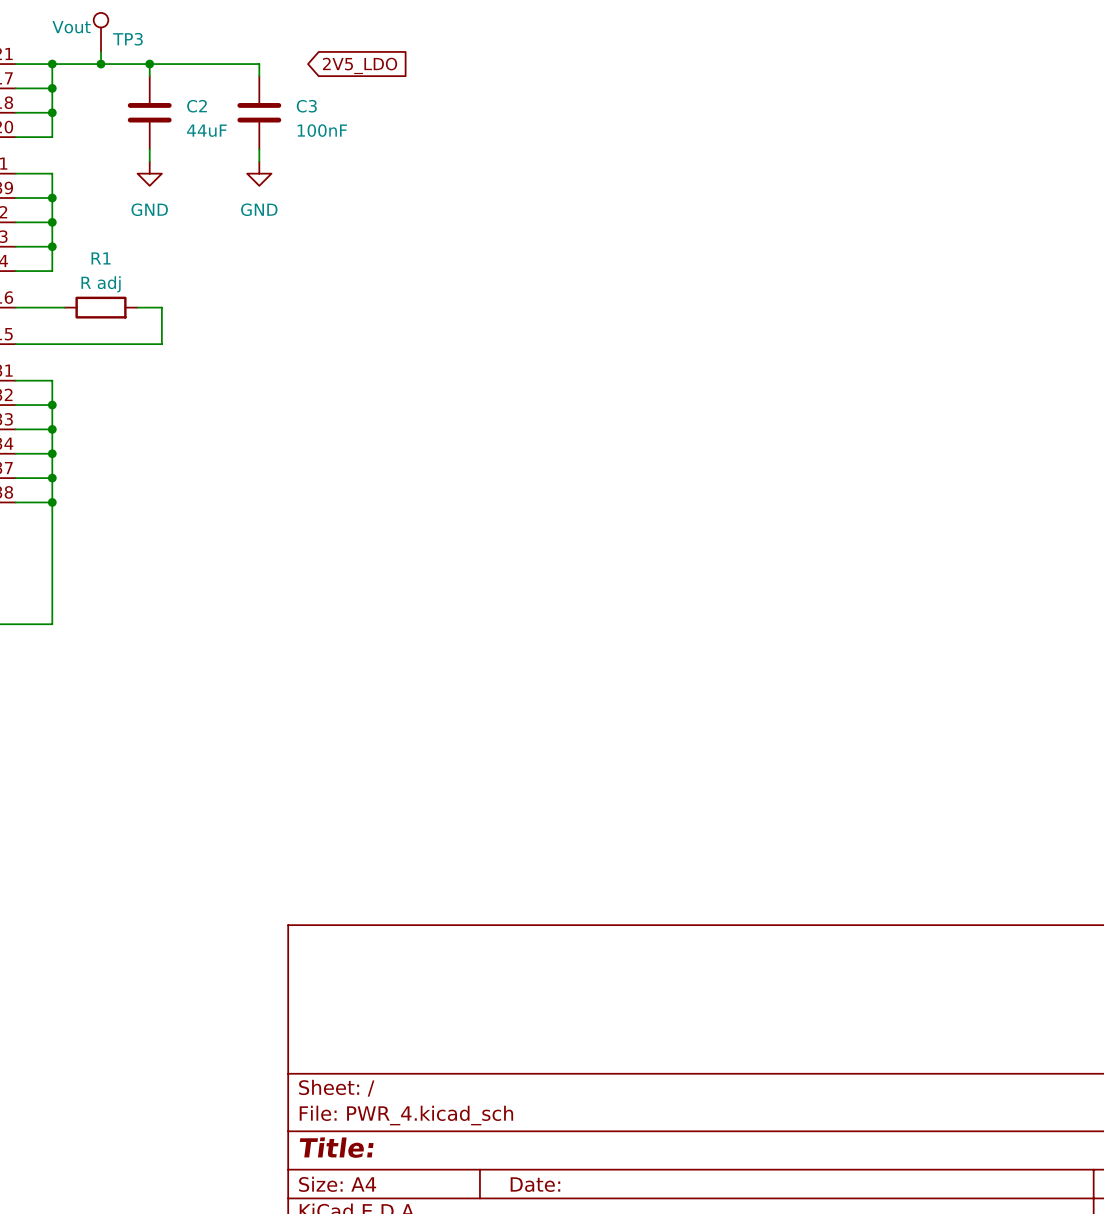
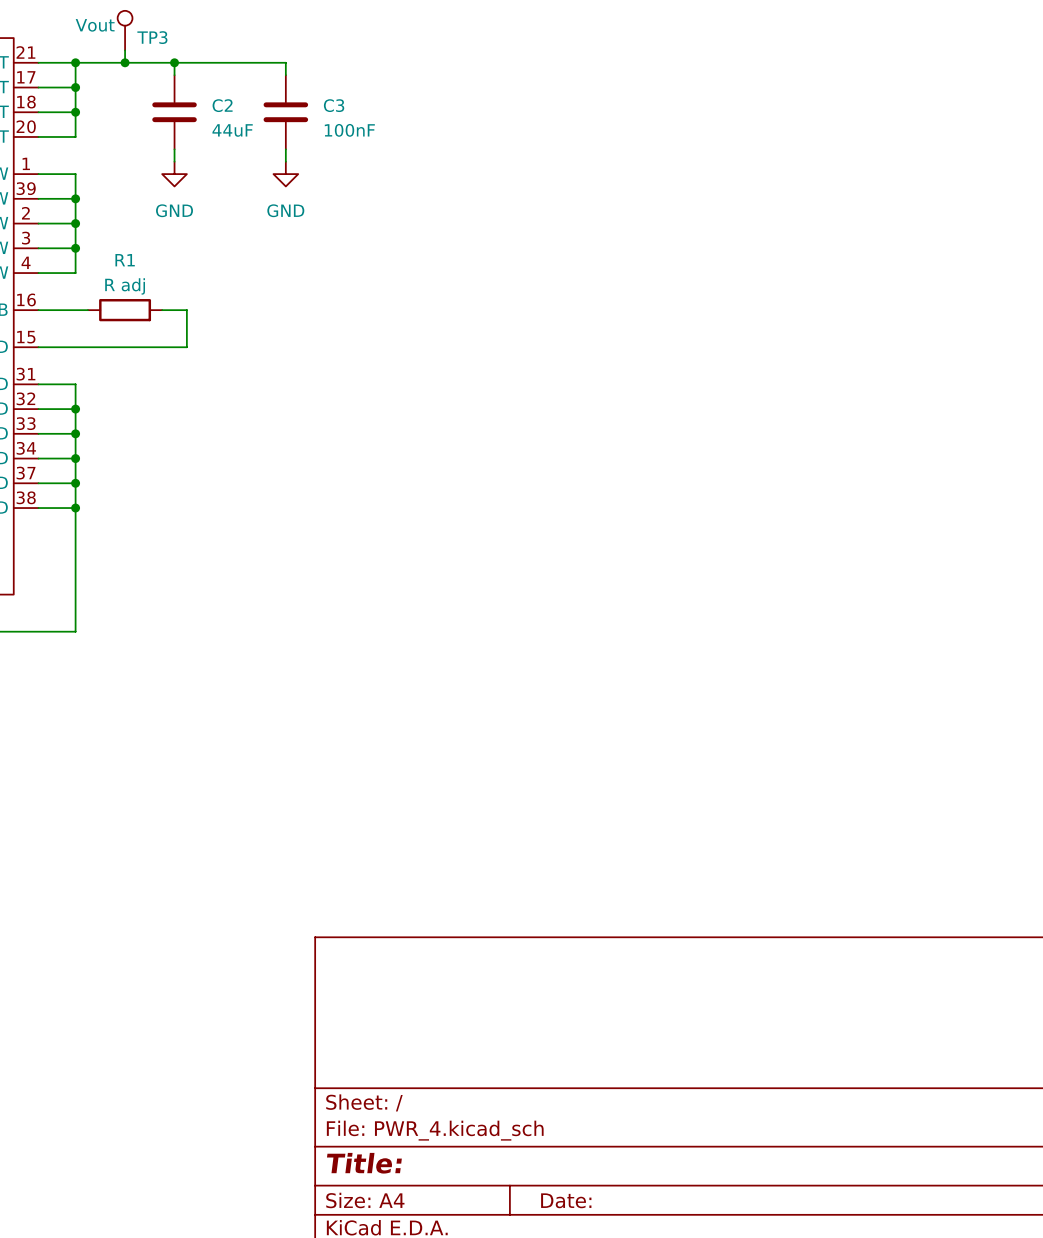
global label: 2V5_LDO (360, 65) -> none

